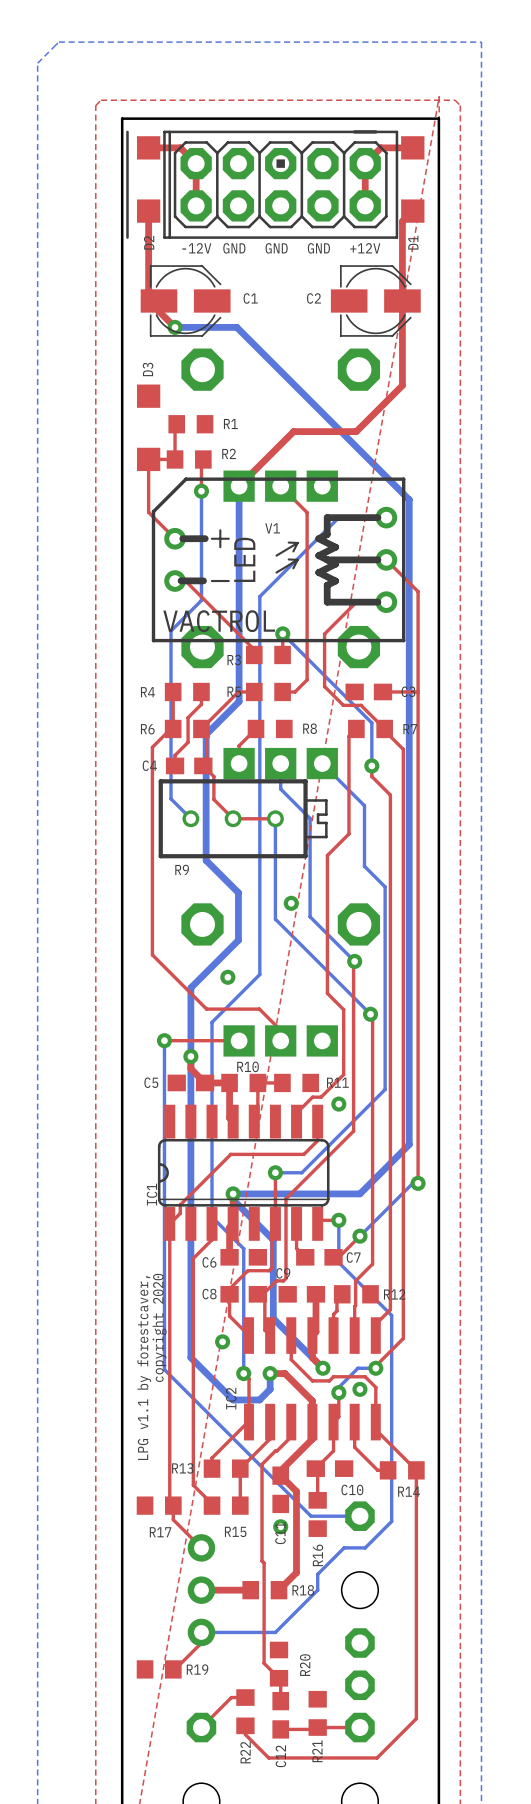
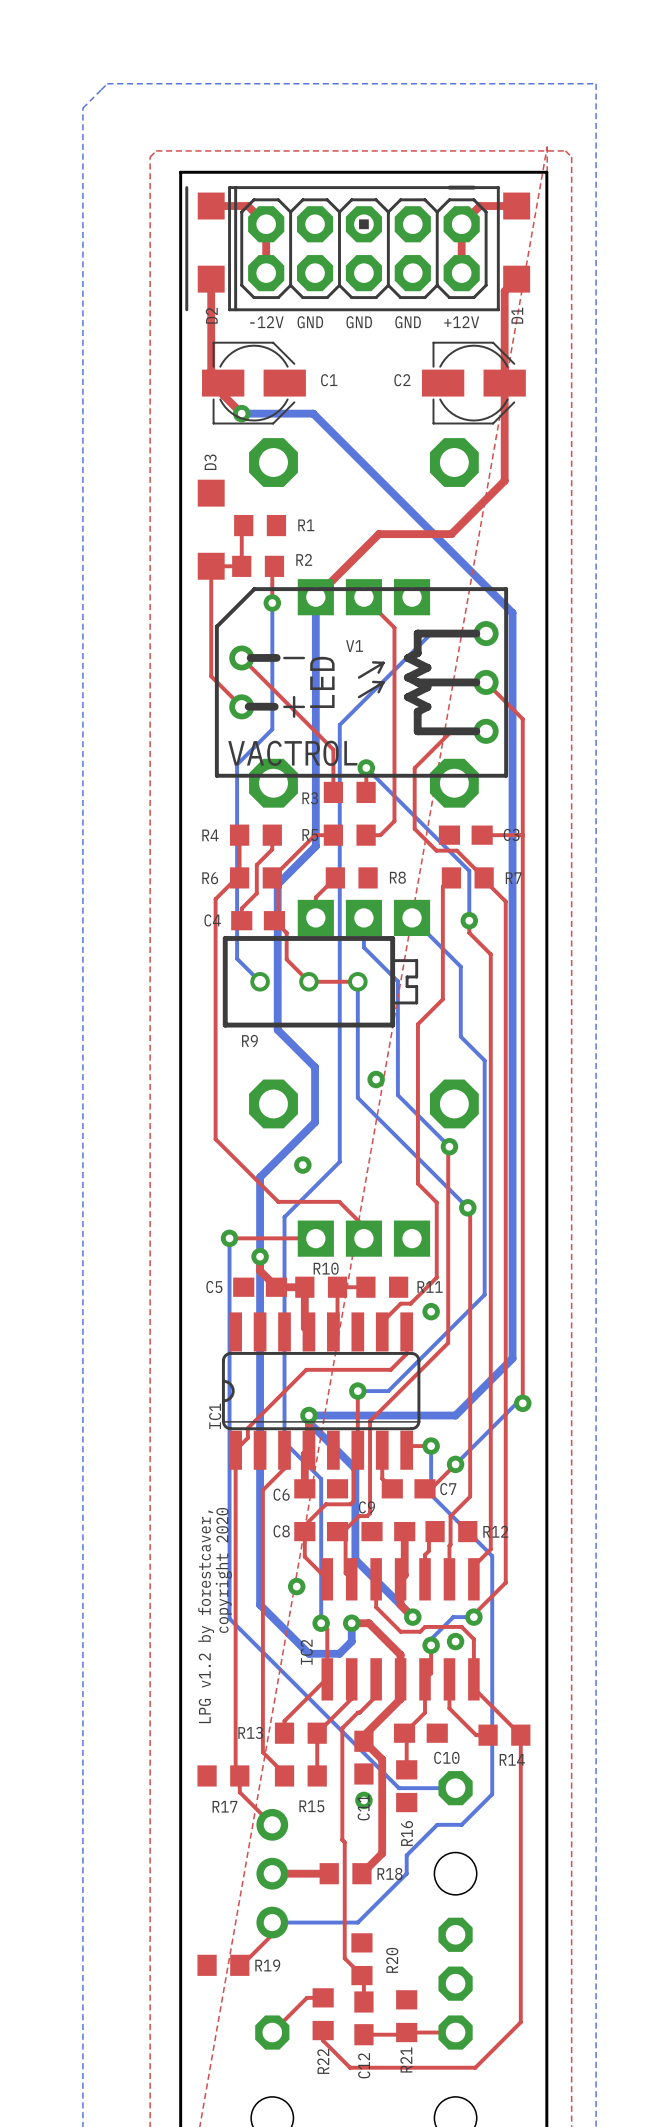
V1 footprint: [151, 477, 406, 643] -> [214, 587, 509, 778]
top track: (148, 512) (175, 538) -> (211, 627) (211, 676) (241, 706)
top track: (175, 581) (185, 581) (254, 649) -> (241, 658) (333, 749) (333, 786)
text: LPG v1.1 by forestcaver, (144, 1367) -> LPG v1.2 by forestcaver, (206, 1616)

